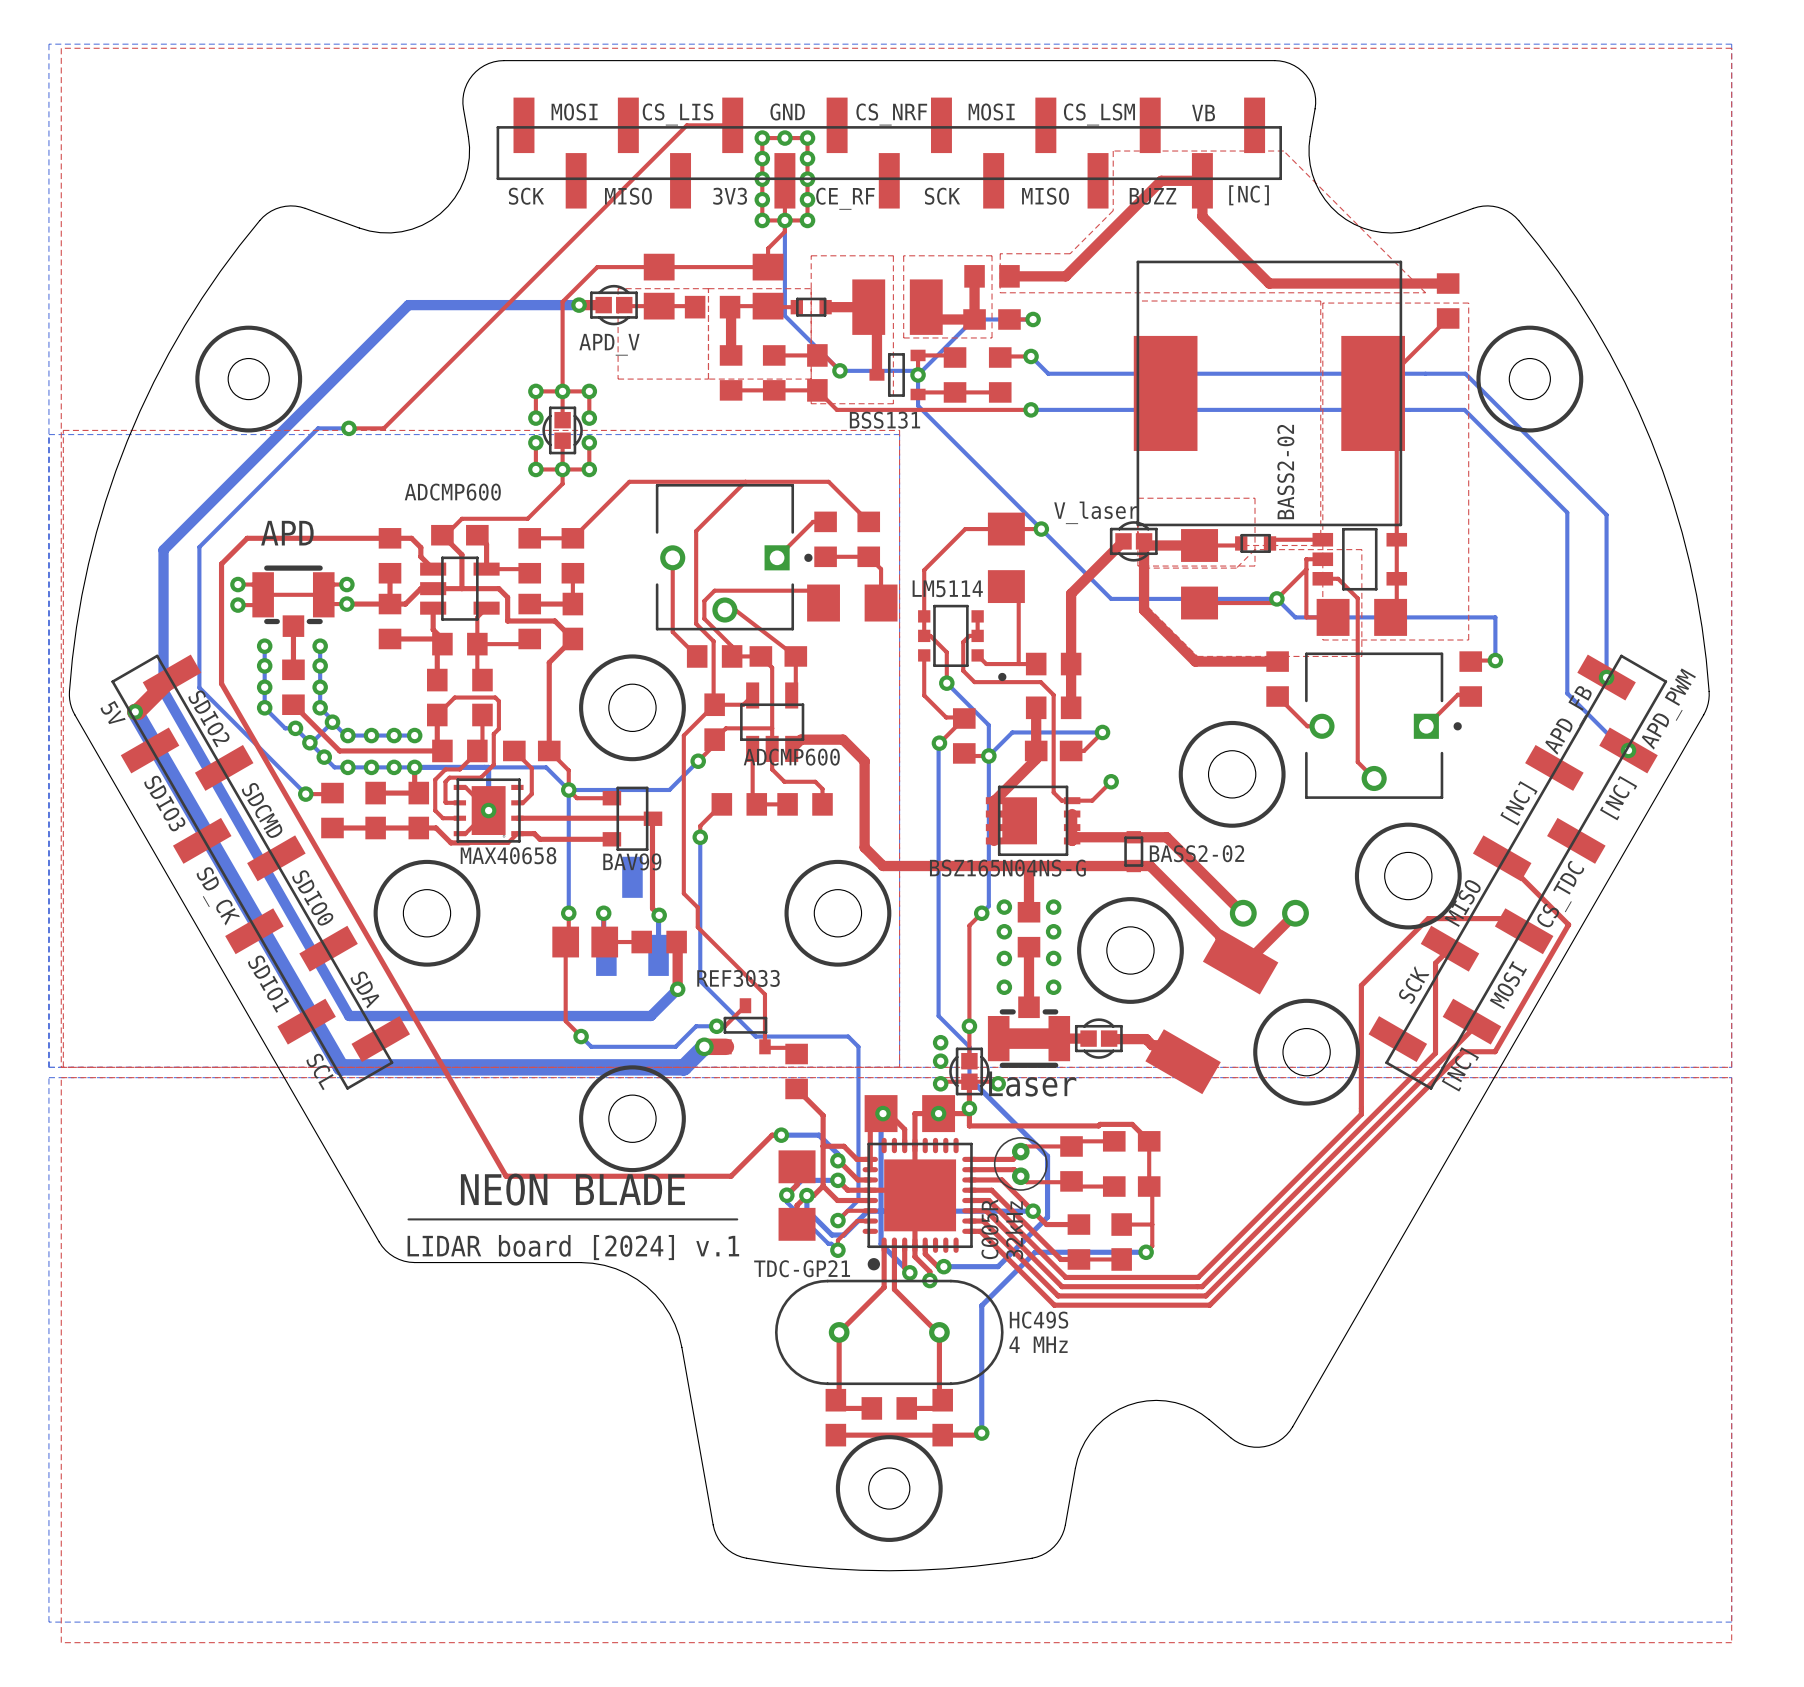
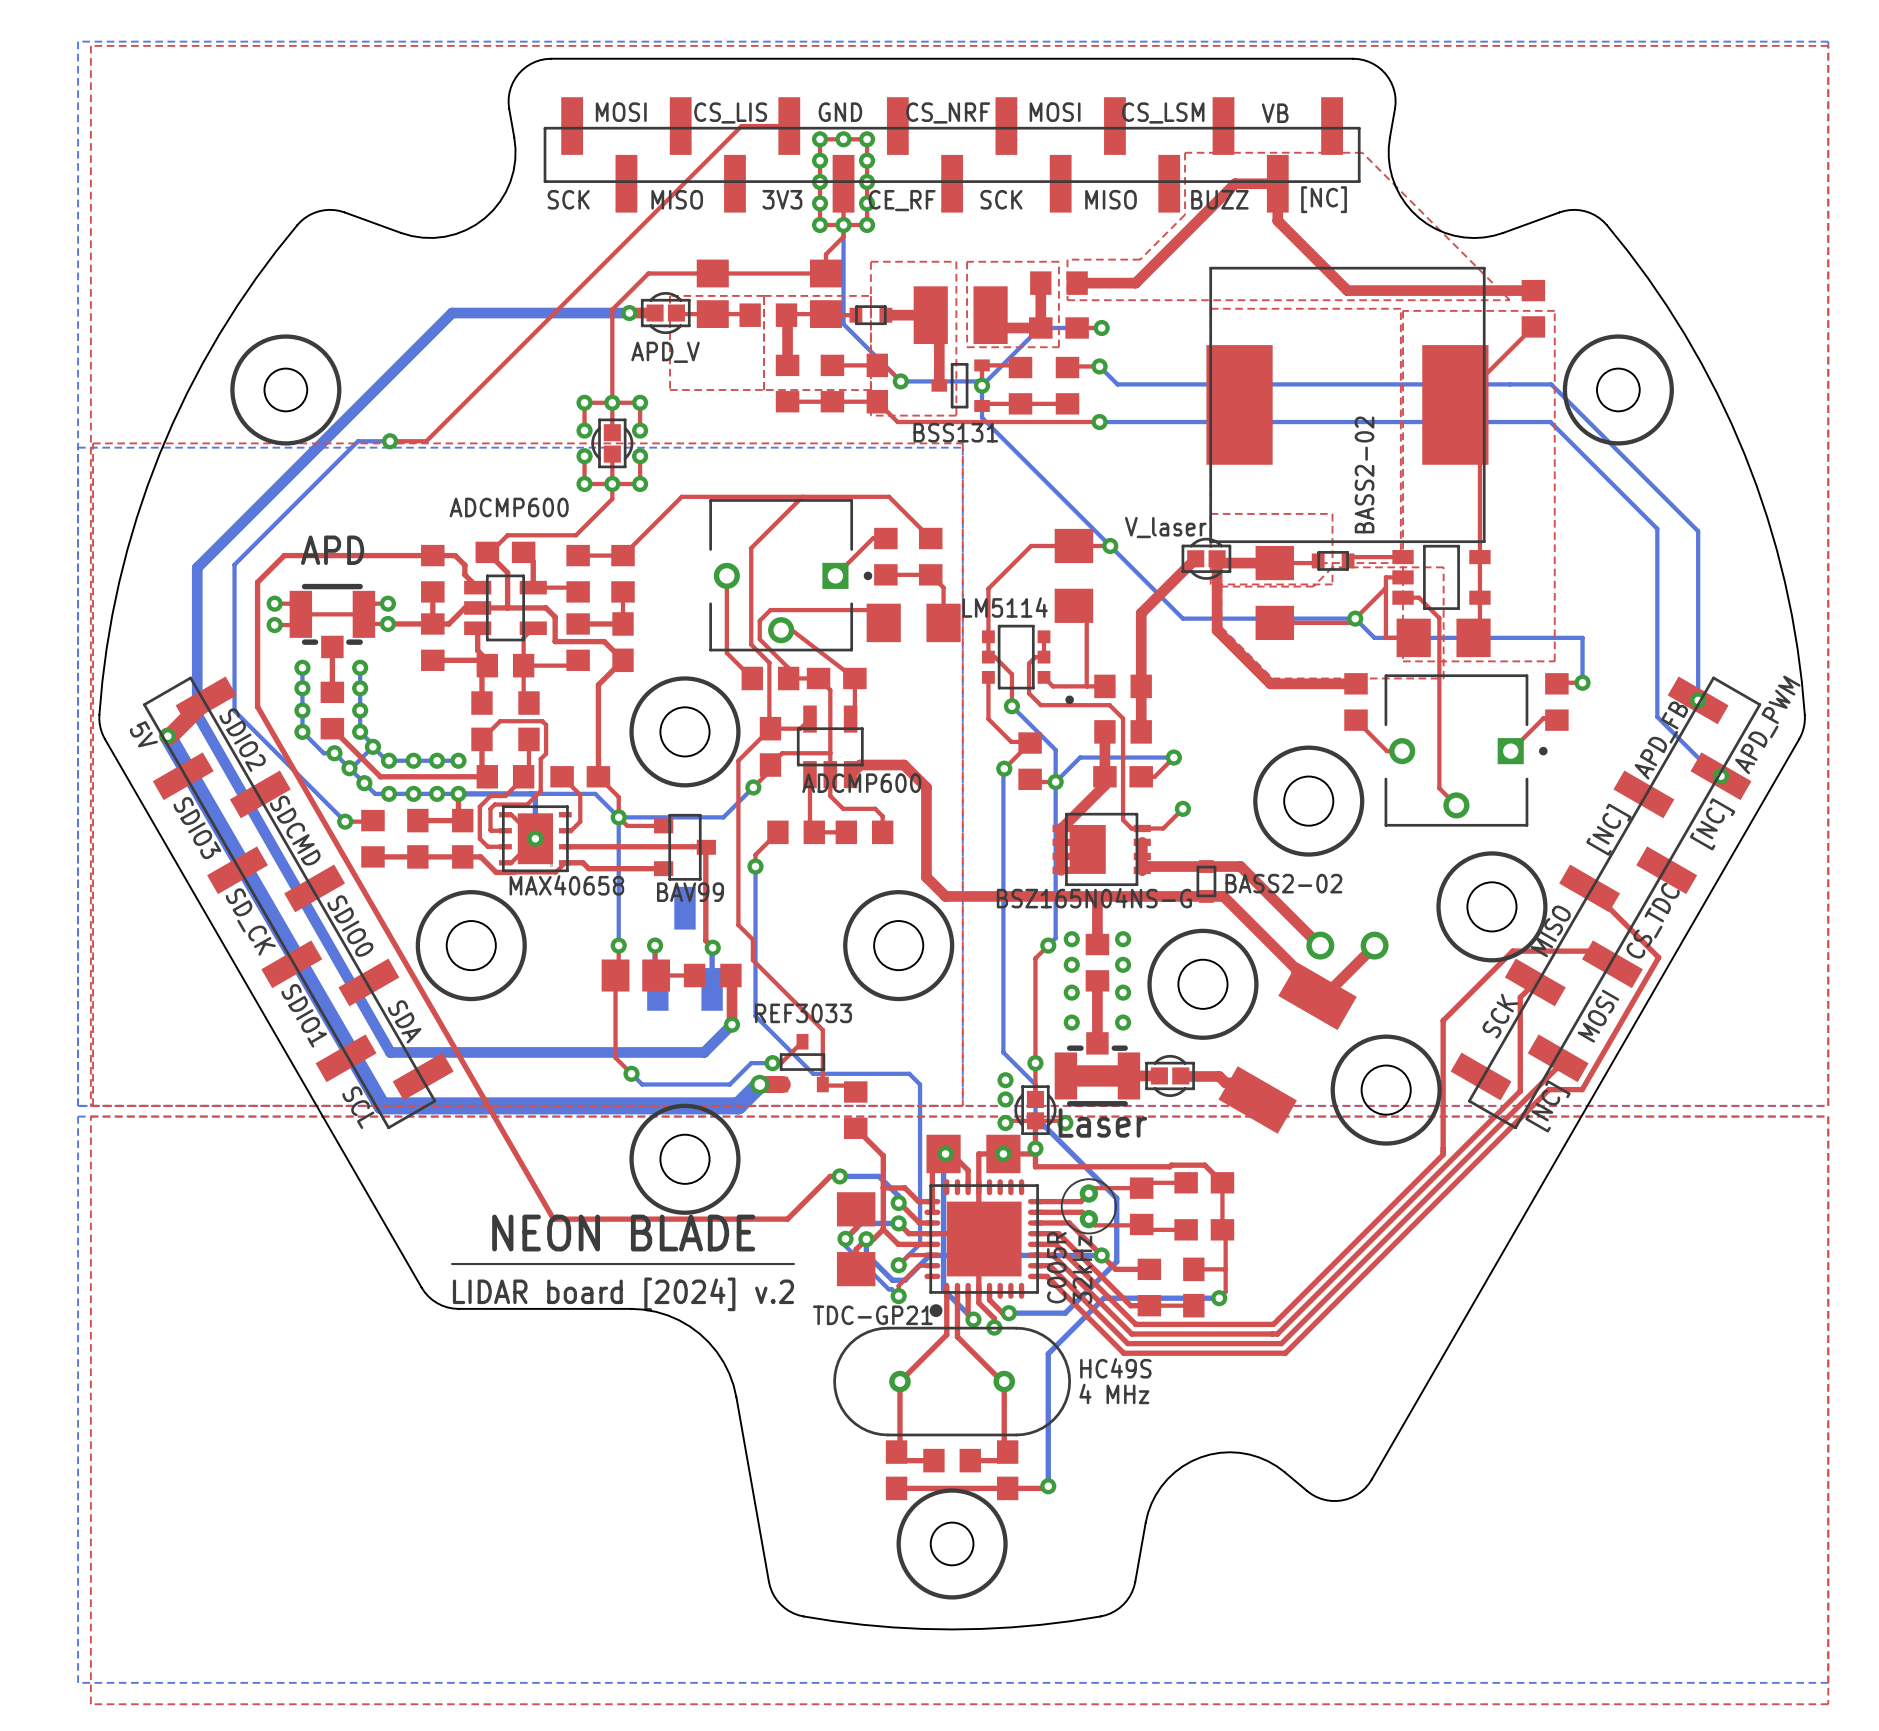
text: LIDAR board [2024] v.1 (573, 1247) -> LIDAR board [2024] v.2 (623, 1294)

